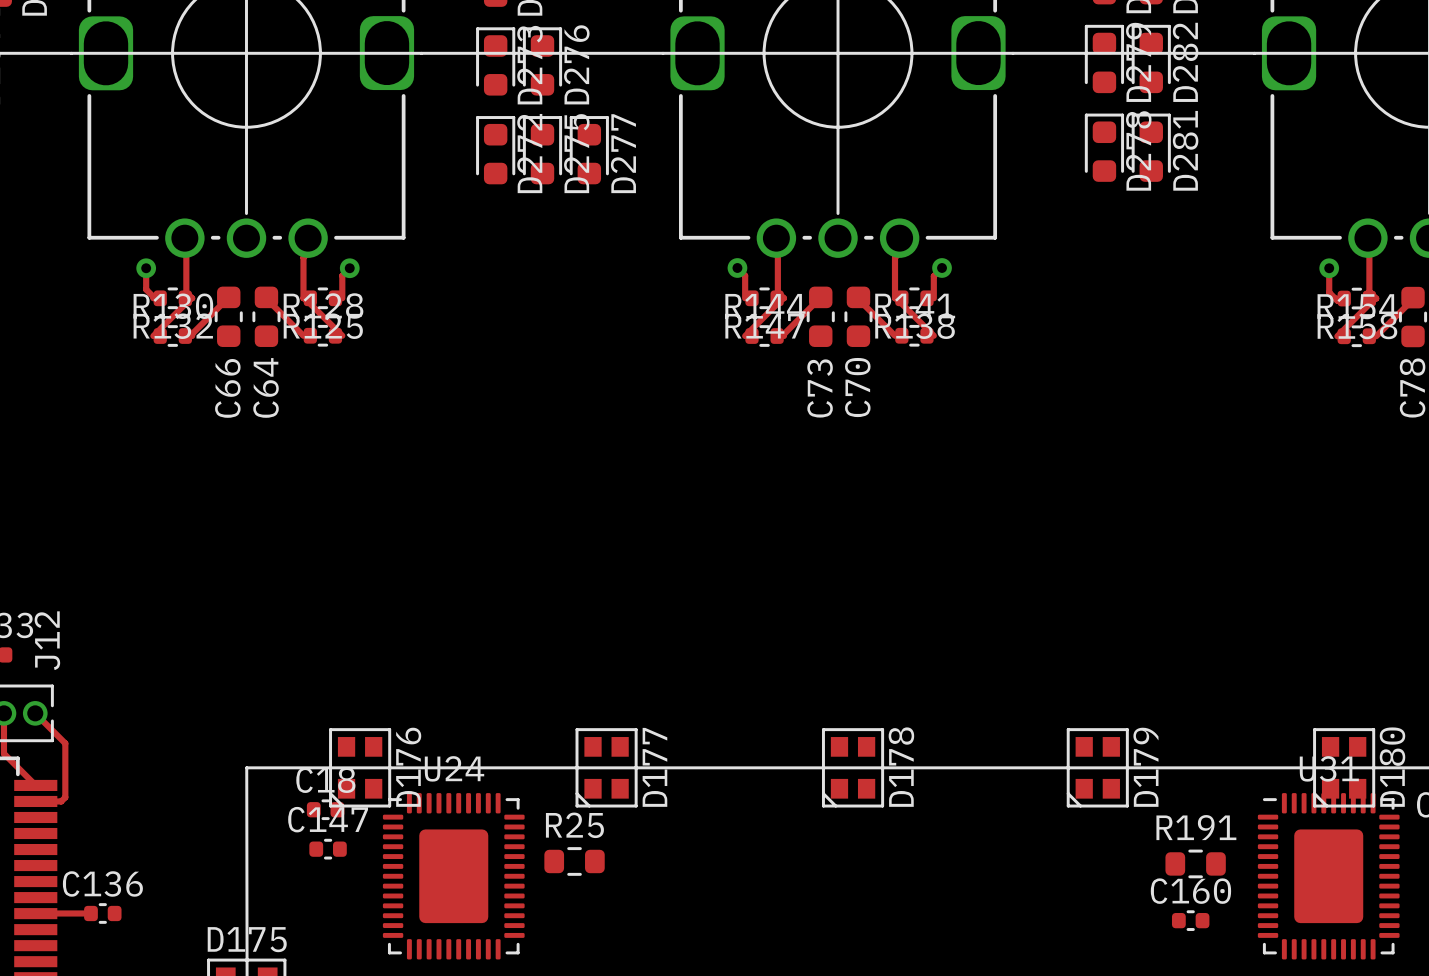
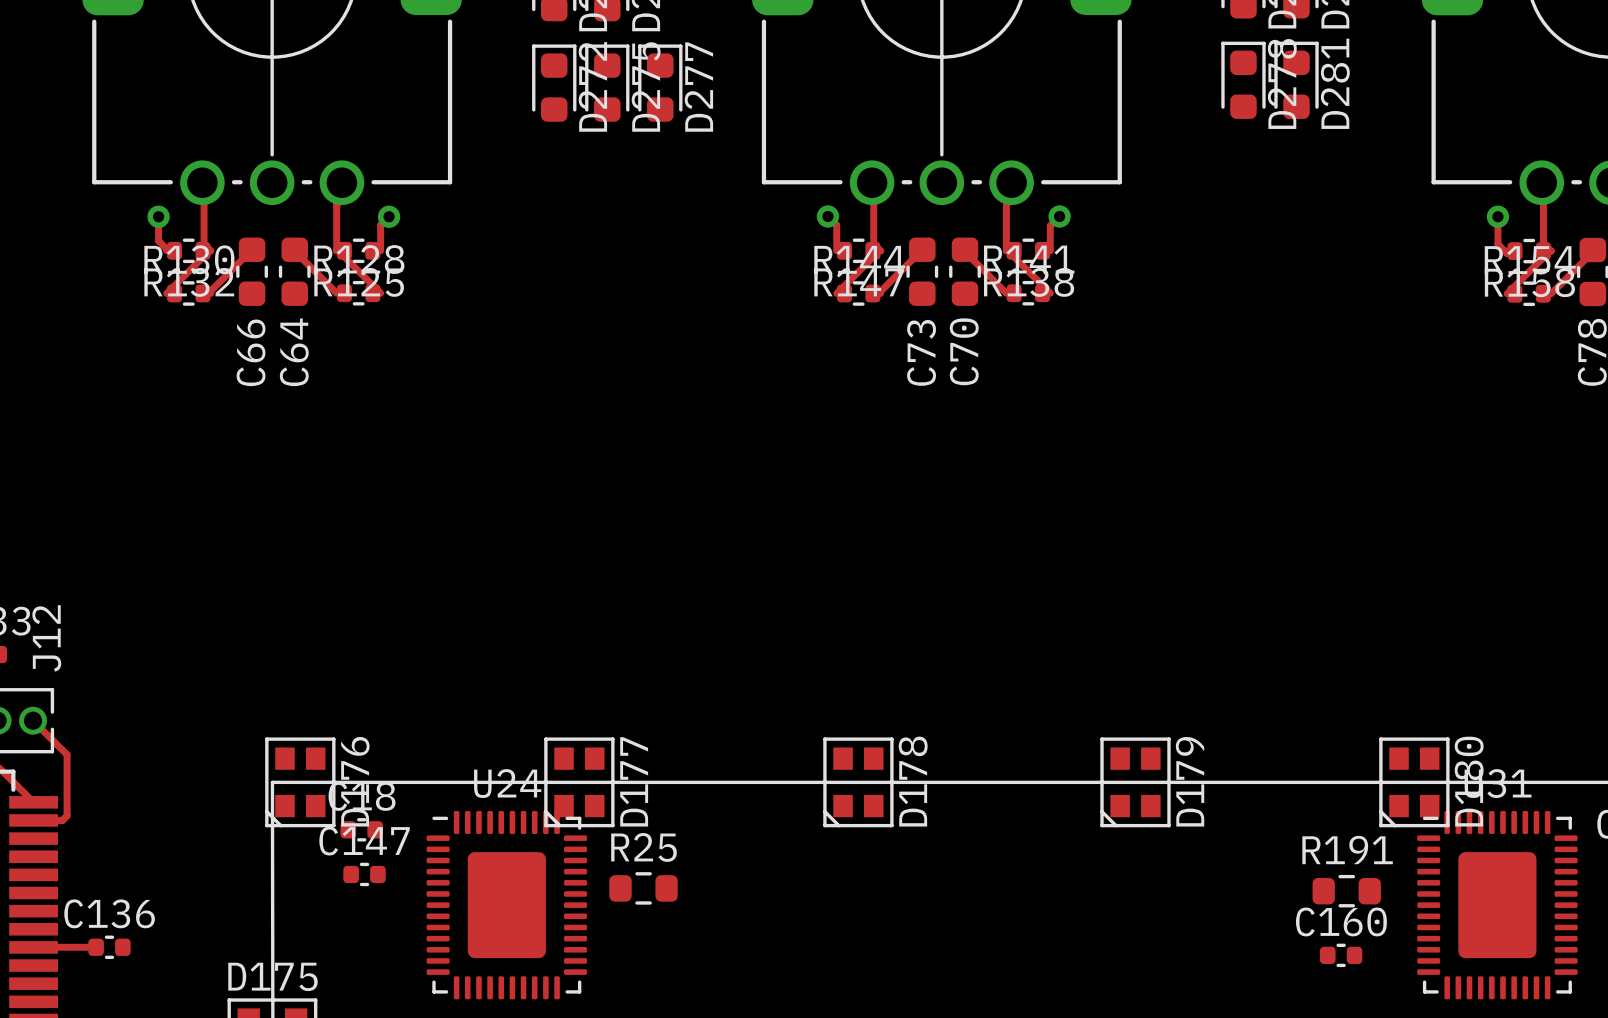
D176 position: (360, 767) -> (300, 782)
D177 position: (606, 767) -> (579, 782)
D178 position: (853, 767) -> (858, 782)
D179 position: (1097, 767) -> (1135, 782)
D180 position: (1344, 767) -> (1414, 782)

